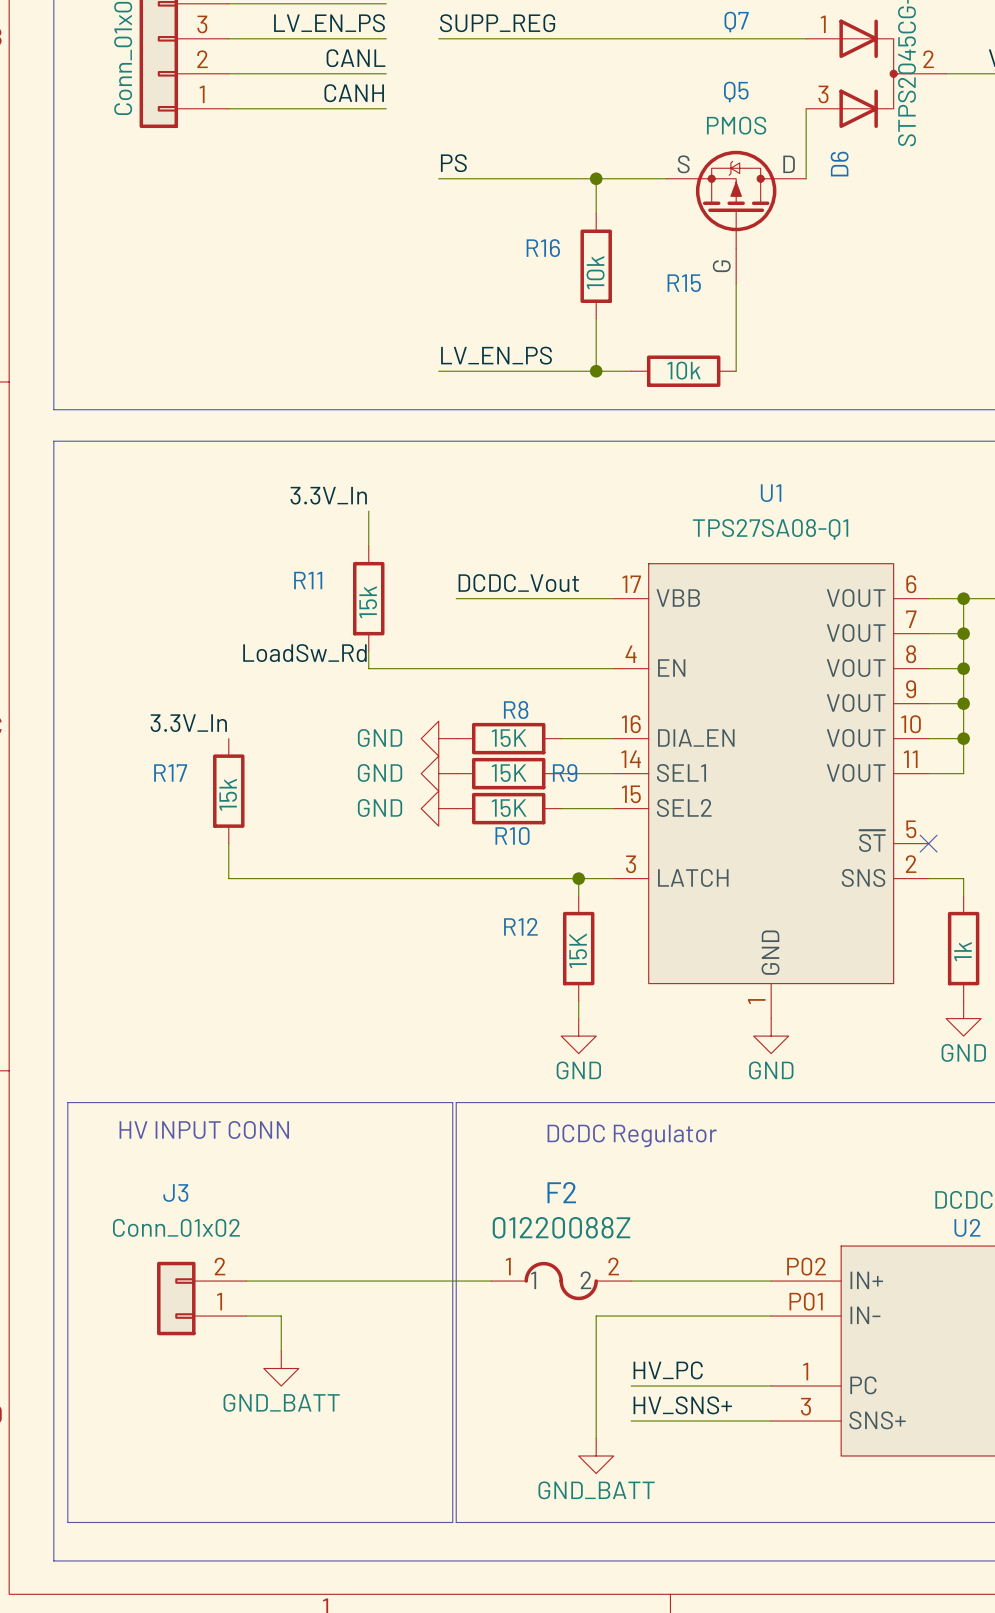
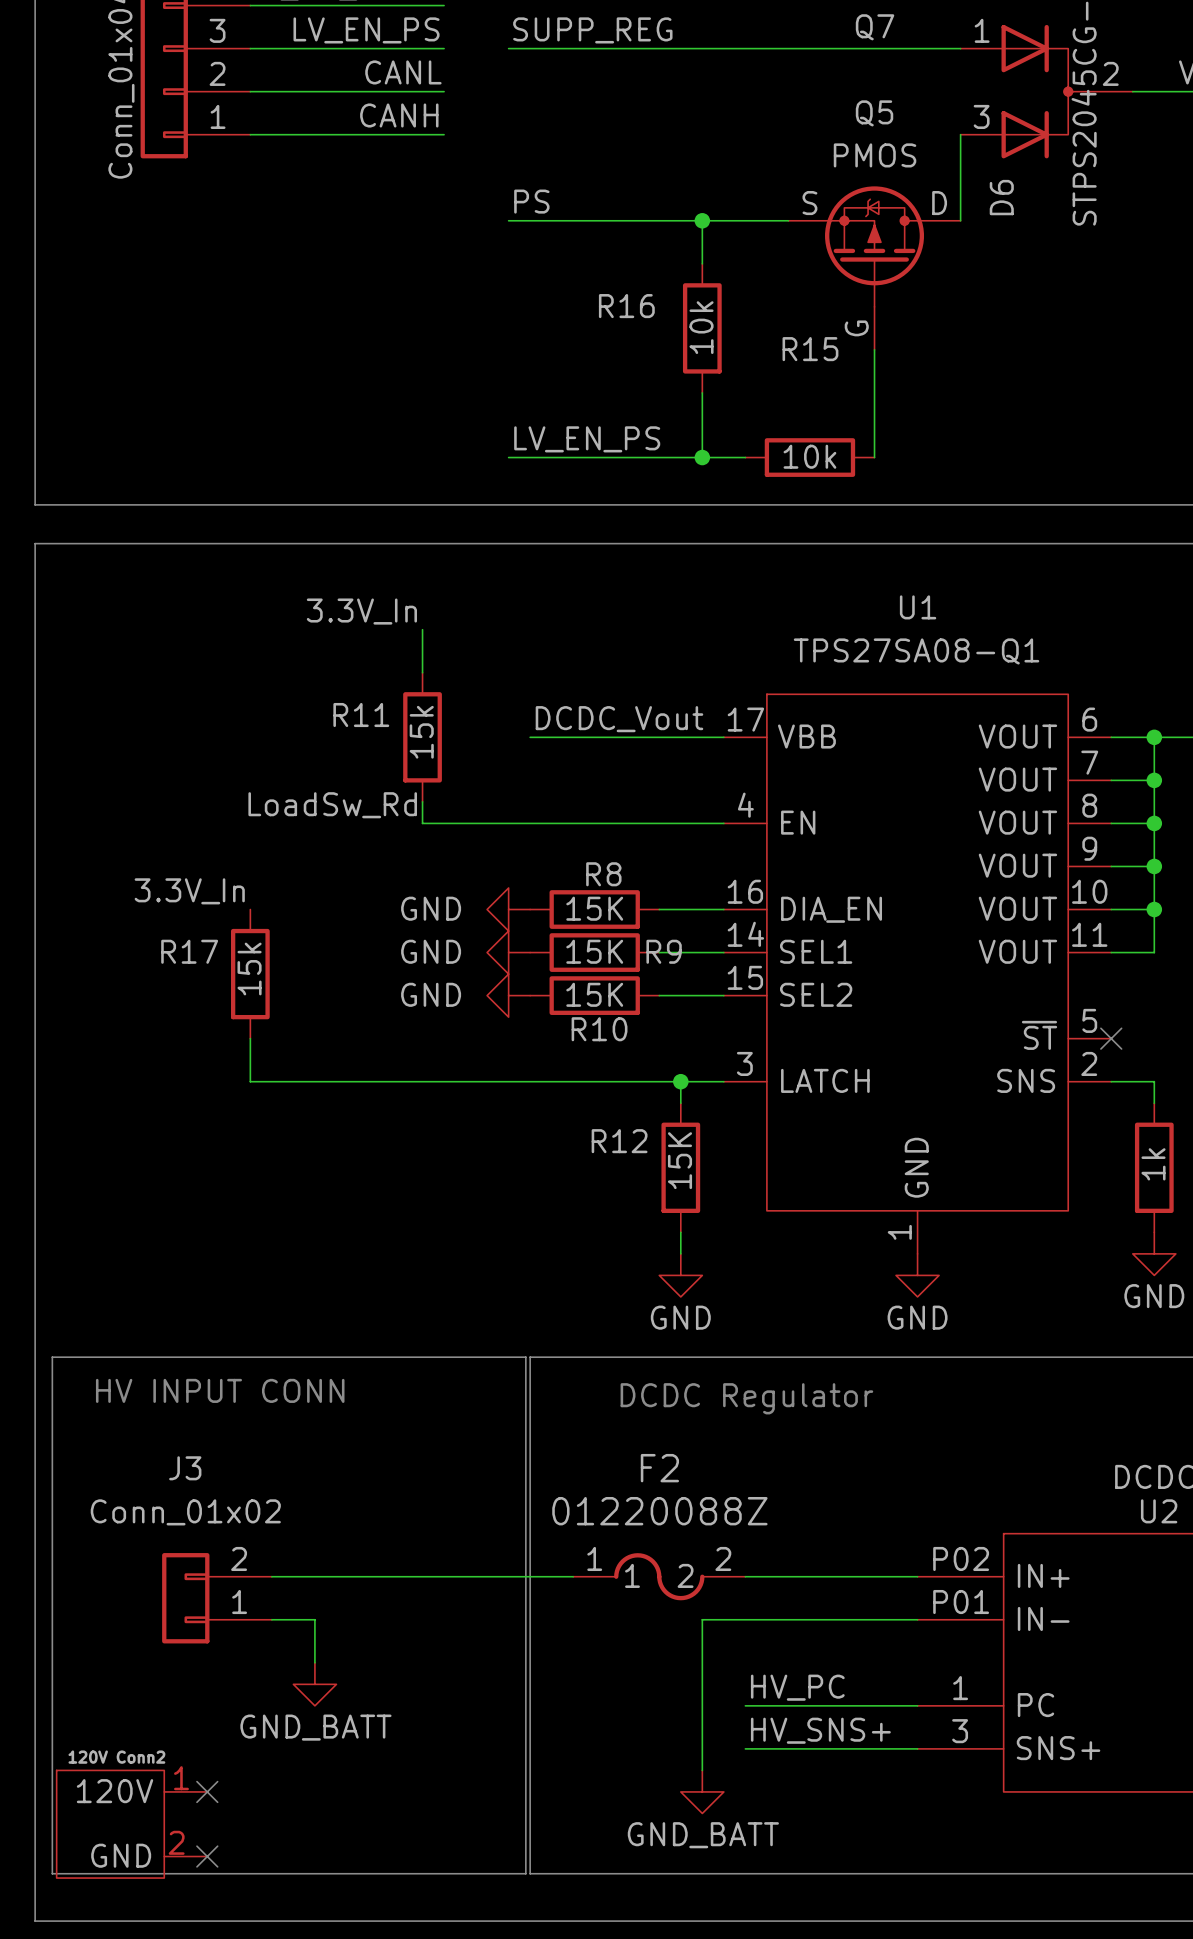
no-connect mark: none -> (207, 1791)
120V Conn2: none -> (131, 1824)
no-connect mark: none -> (207, 1856)

